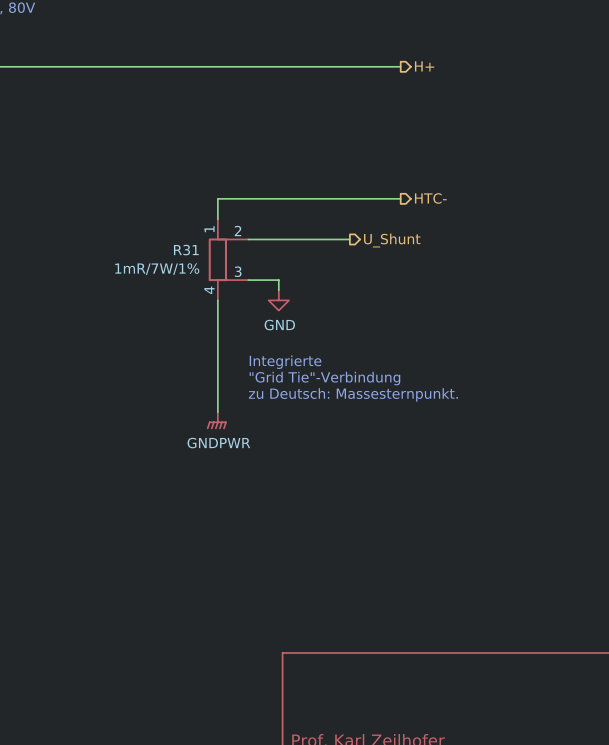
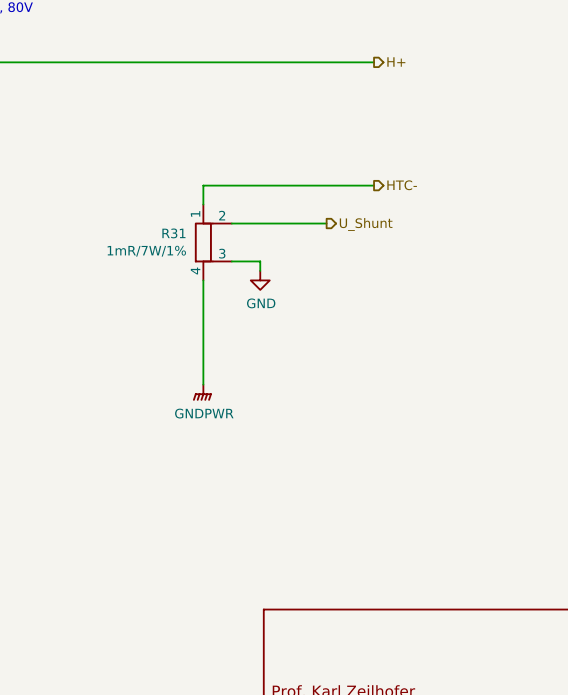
text: Integrierte (285, 362) -> none
text: "Grid Tie"-Verbindung (324, 378) -> none
text: zu Deutsch: Massesternpunkt. (353, 394) -> none

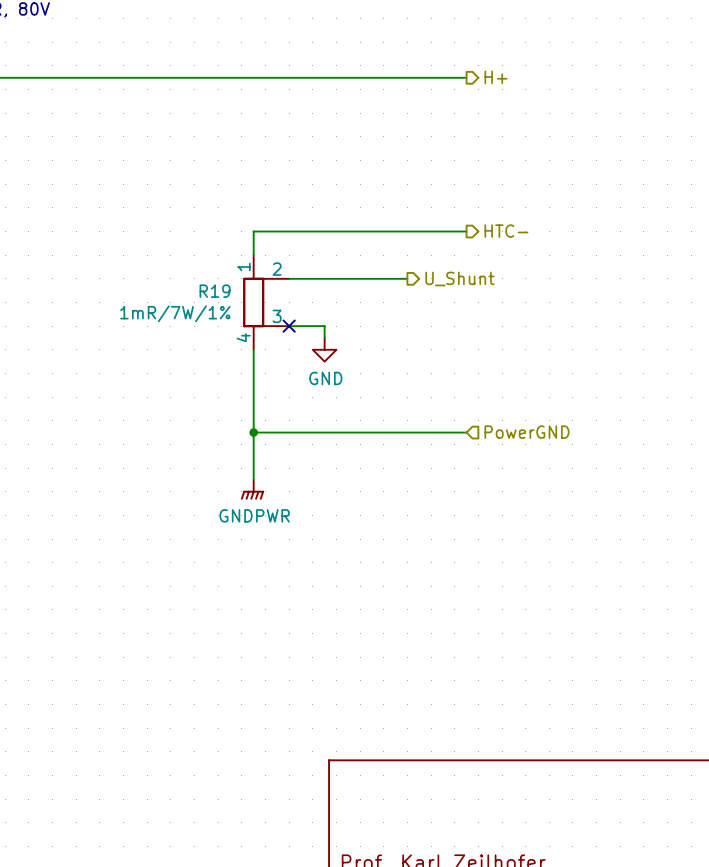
R31 name: R31 (173, 233) -> R19 (215, 291)
no-connect mark: none -> (289, 326)
wire: none -> (253, 432) (466, 432)
junction: none -> (253, 432)
hierarchical label: none -> PowerGND (526, 432)

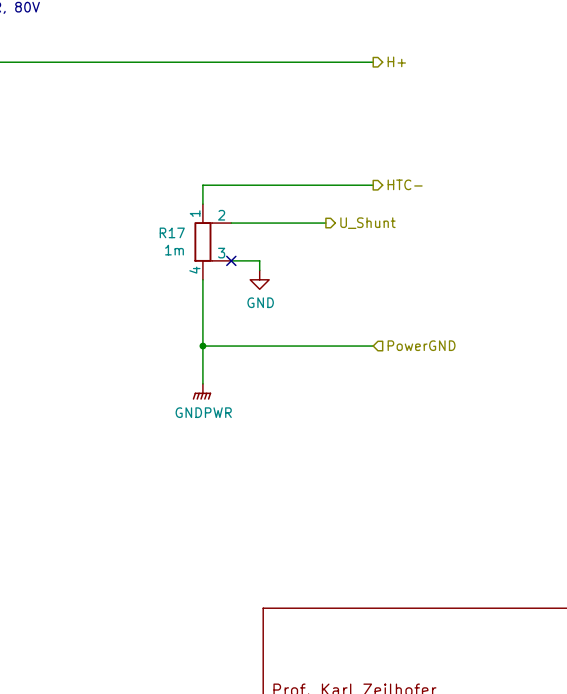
R19 name: R19 (215, 291) -> R17 (172, 232)
R19 value: 1mR/7W/1% (175, 313) -> 1m (174, 250)

